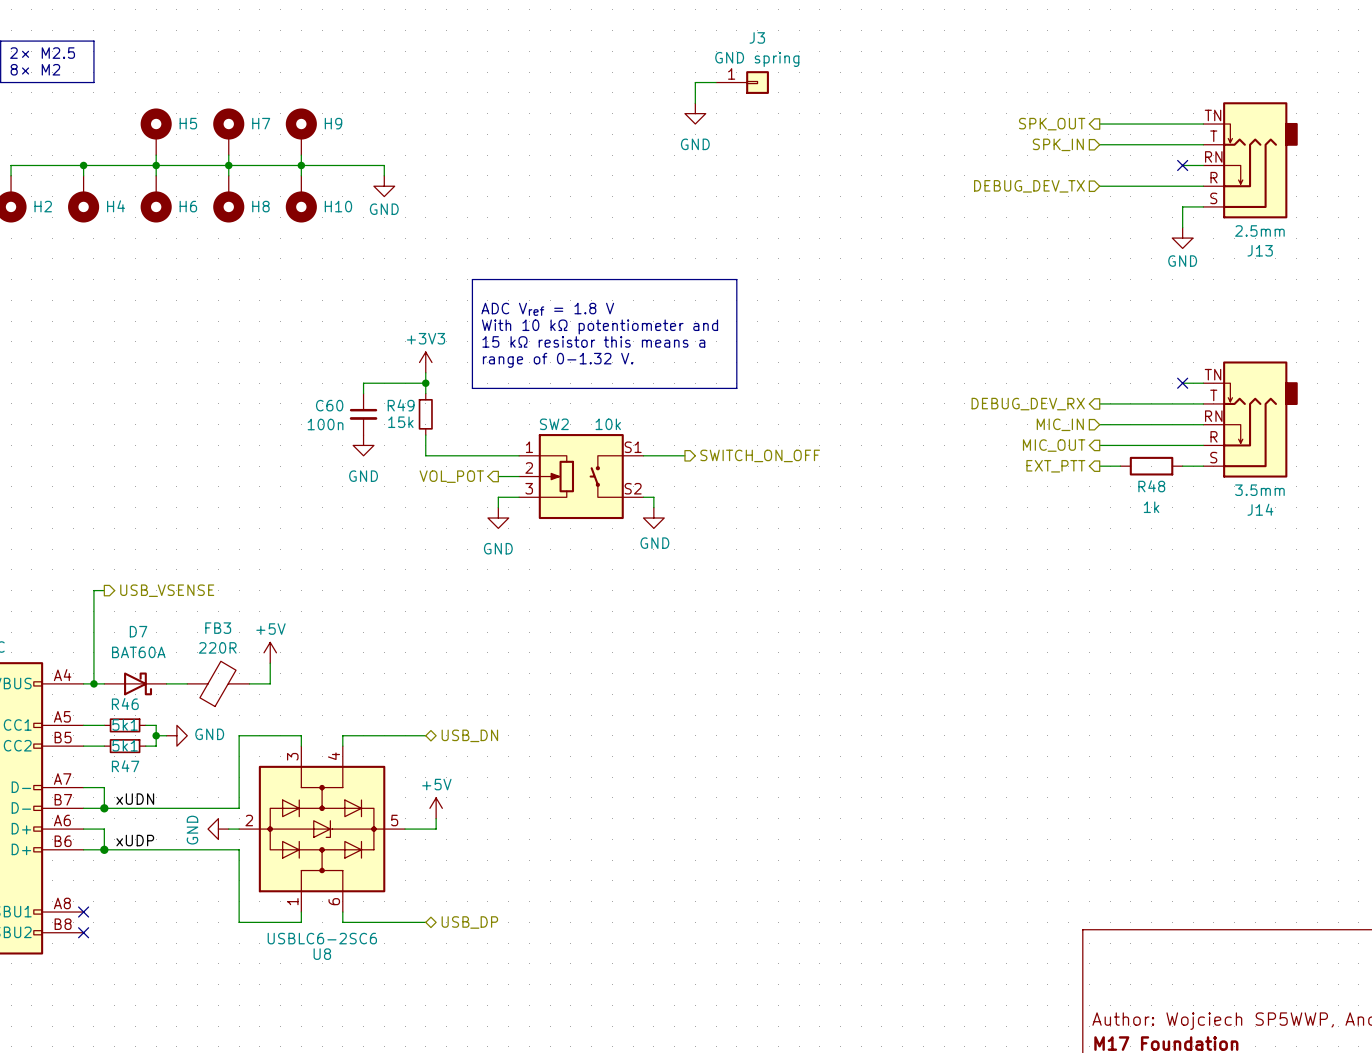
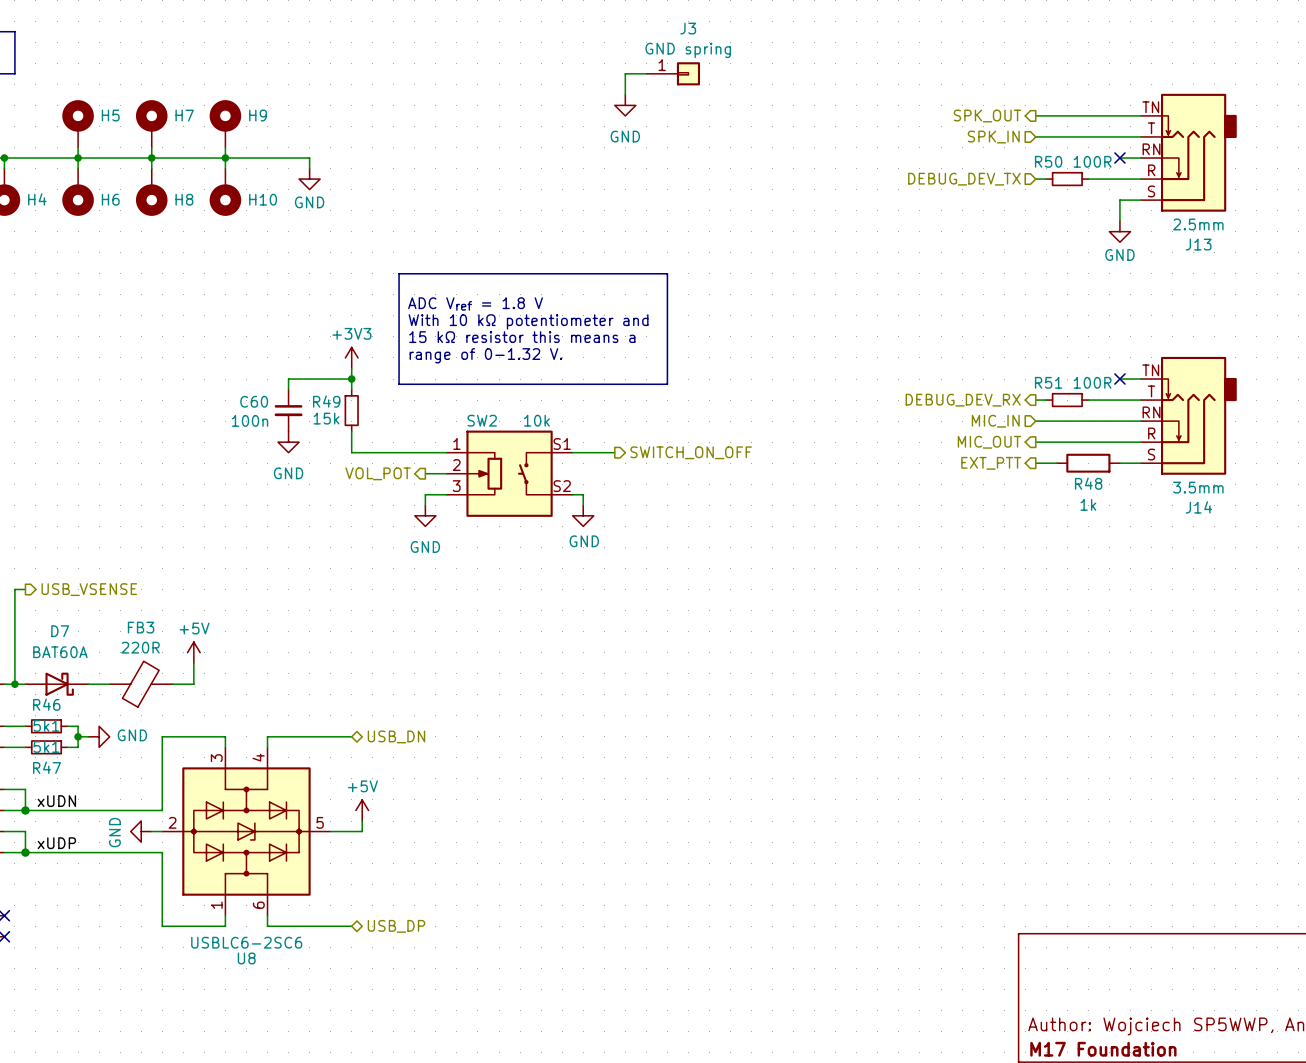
wire: (1110, 186) (1151, 186) -> none
R50: none -> 100R (1067, 179)
wire: (1110, 403) (1151, 403) -> none
R51: none -> 100R (1067, 400)

